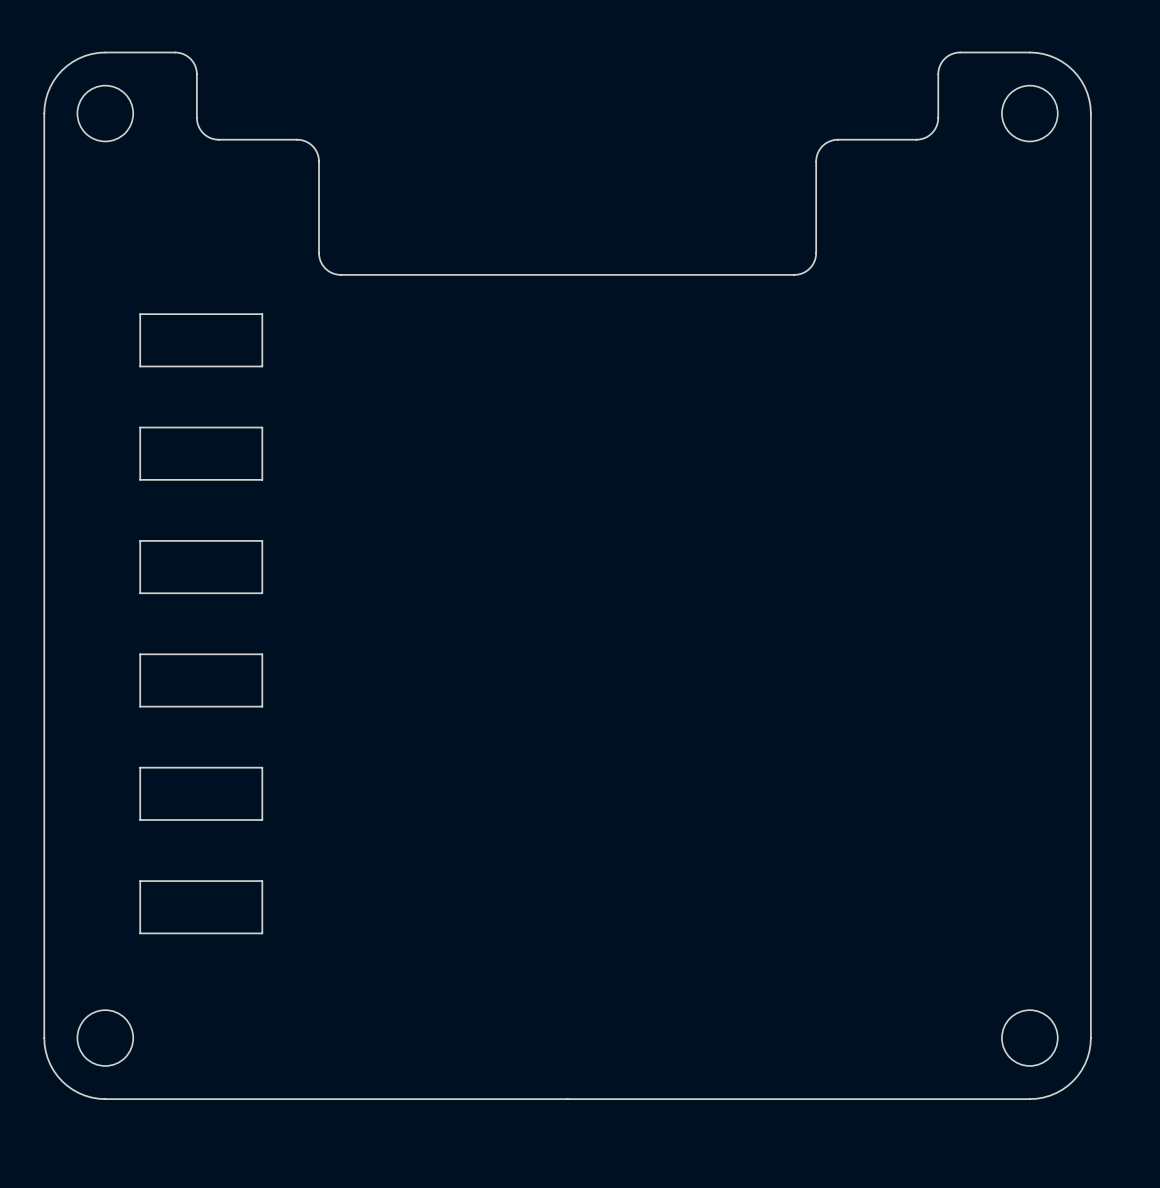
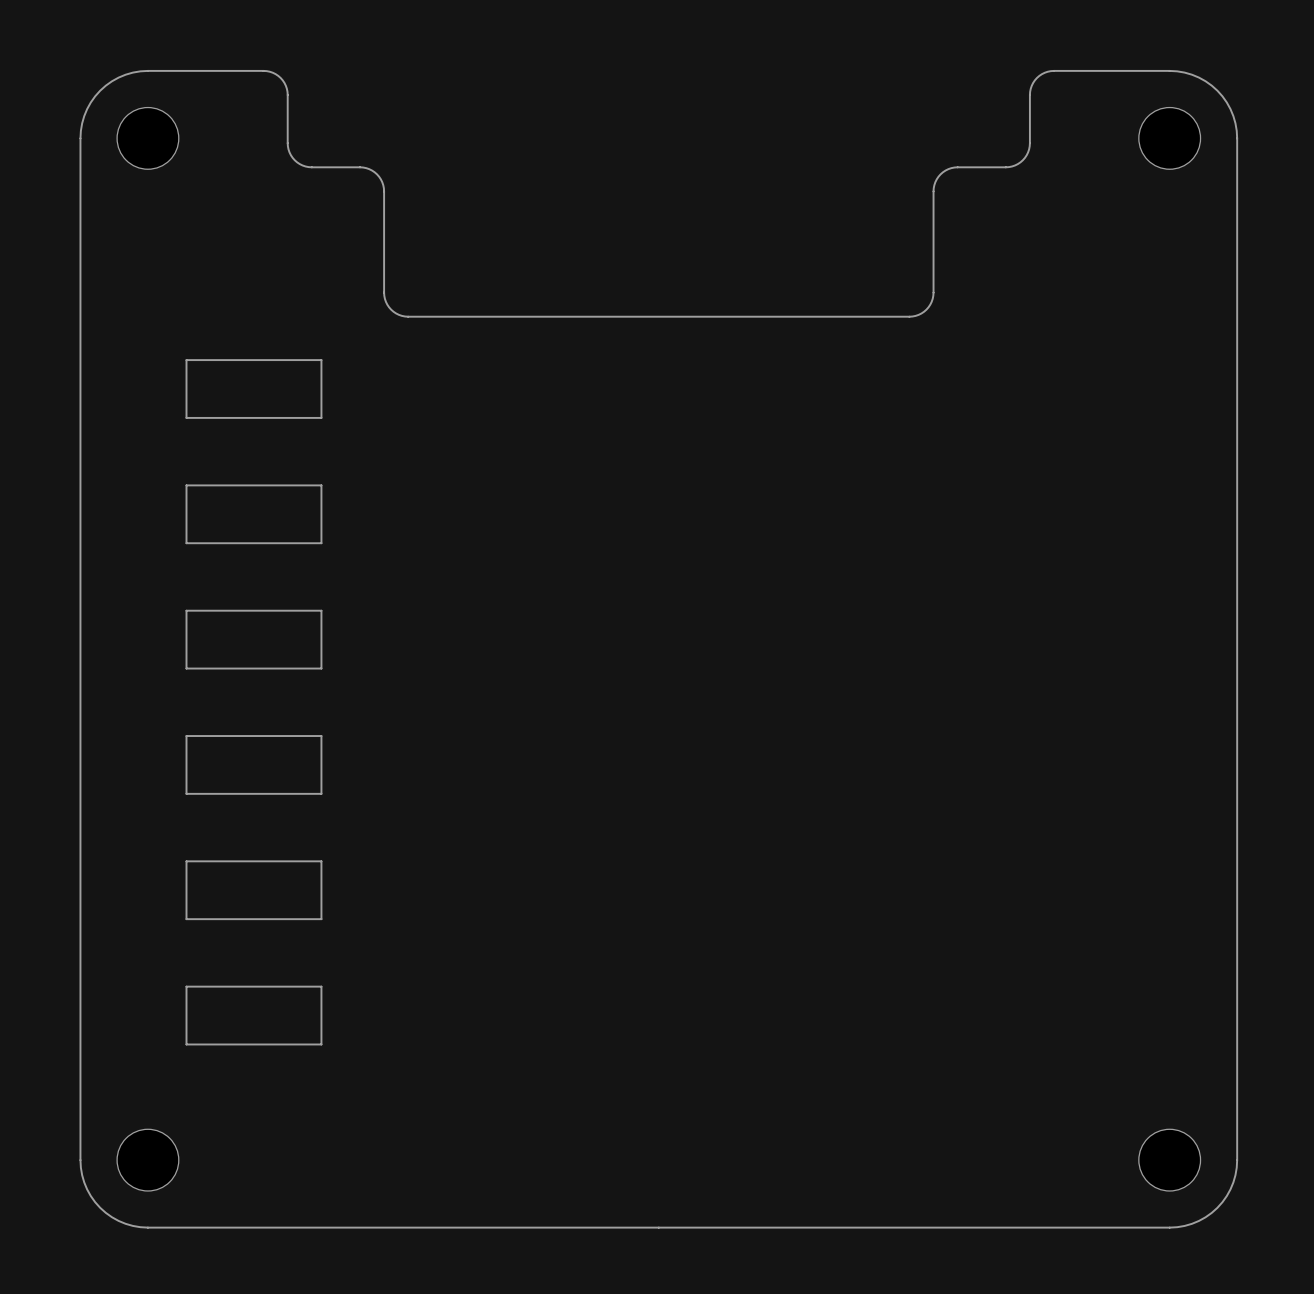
board edge: (175, 52) (188, 57) (195, 65) (197, 120) (203, 133) (215, 139) (253, 139) -> (225, 70) (266, 71) (280, 77) (287, 91) (287, 143) (289, 152) (297, 162) (311, 167)
board edge: (960, 52) (946, 57) (939, 65) (938, 120) (931, 133) (919, 139) (881, 139) -> (1092, 70) (1050, 71) (1036, 77) (1030, 91) (1029, 143) (1028, 152) (1020, 162) (1005, 167)

